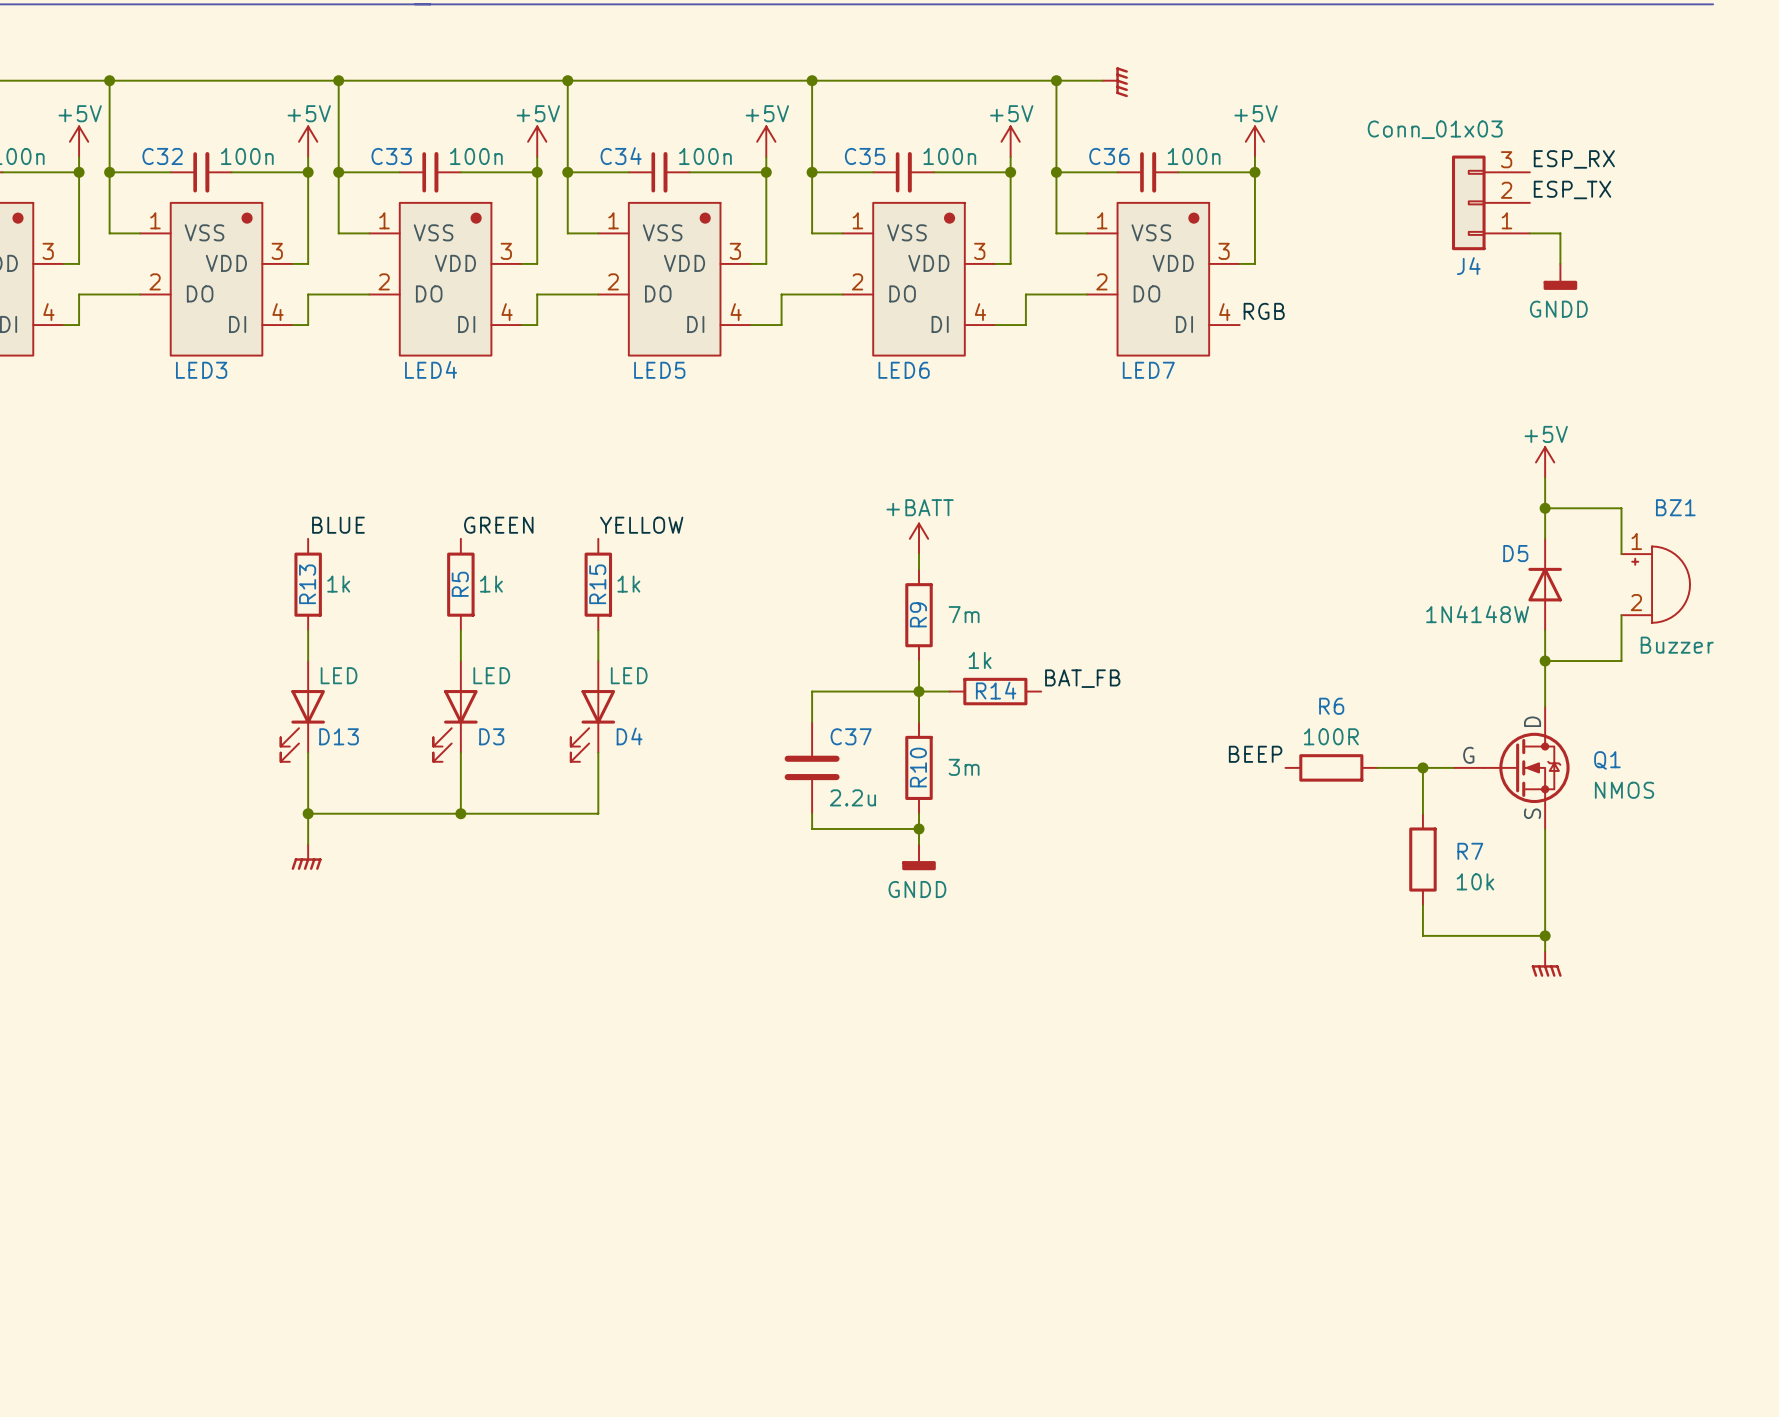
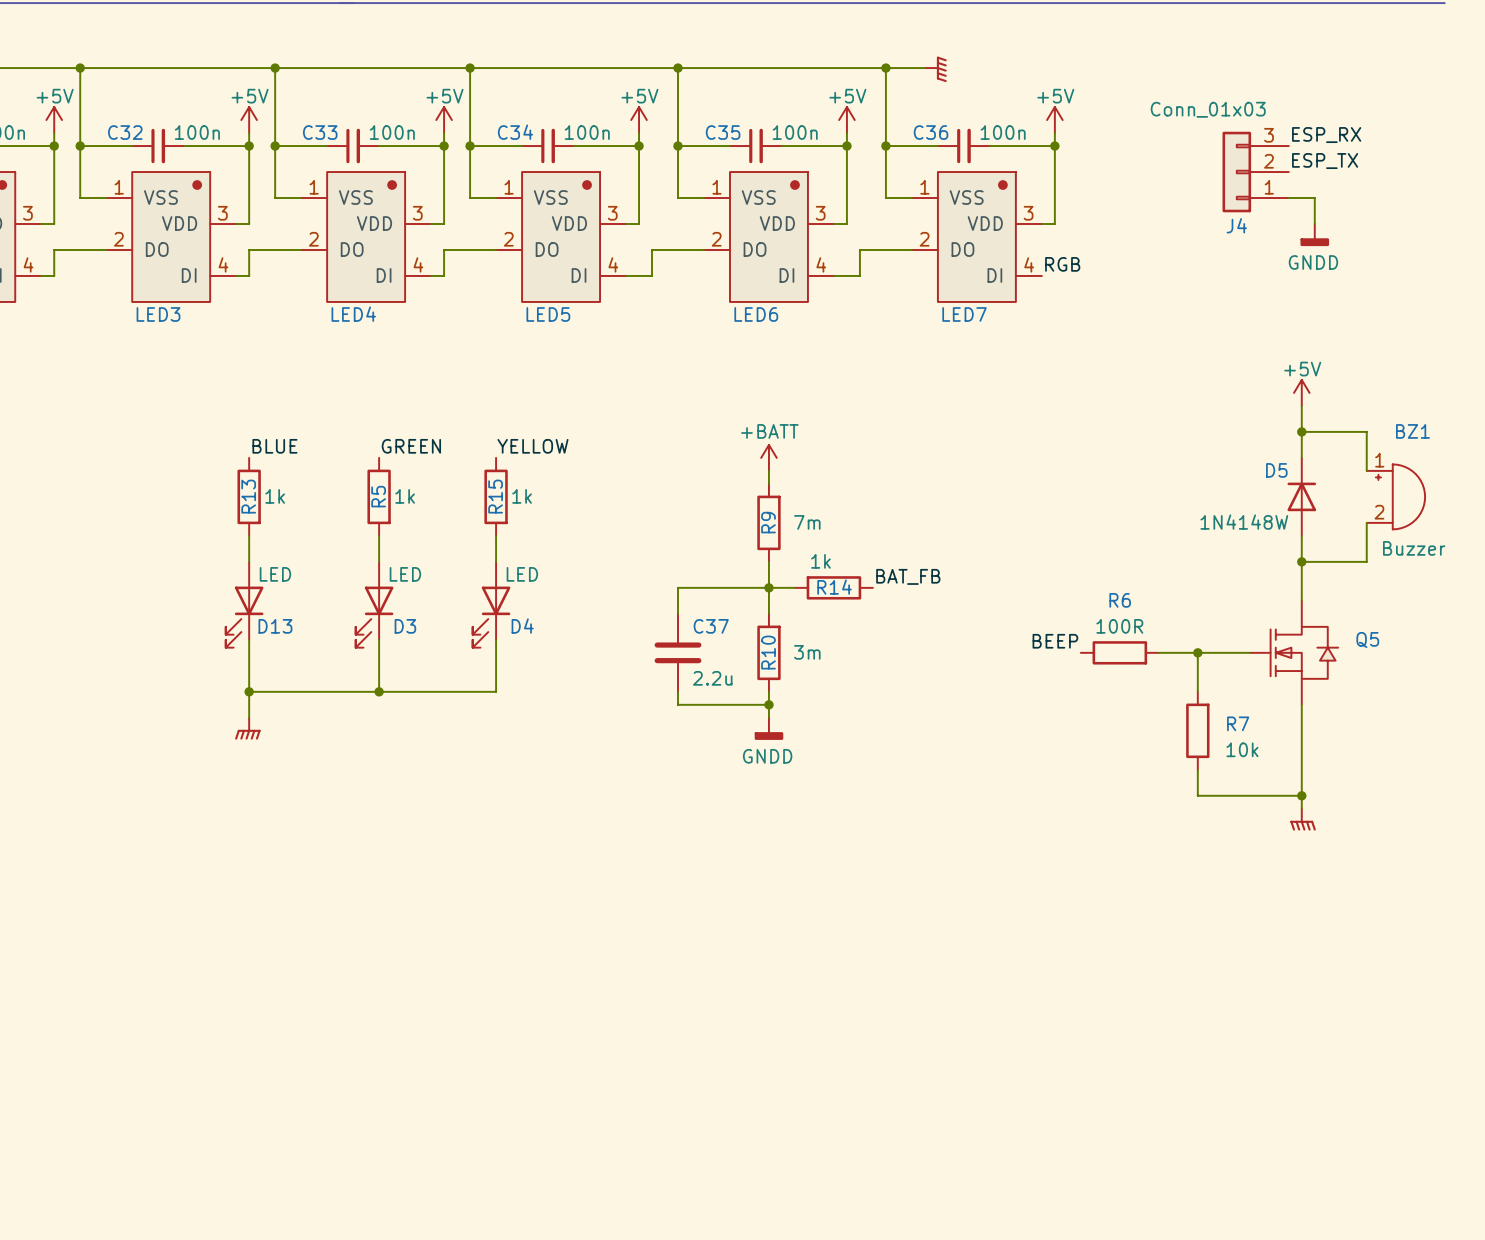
Q1: NMOS (1511, 767) -> none
Q5: none -> (1294, 652)

